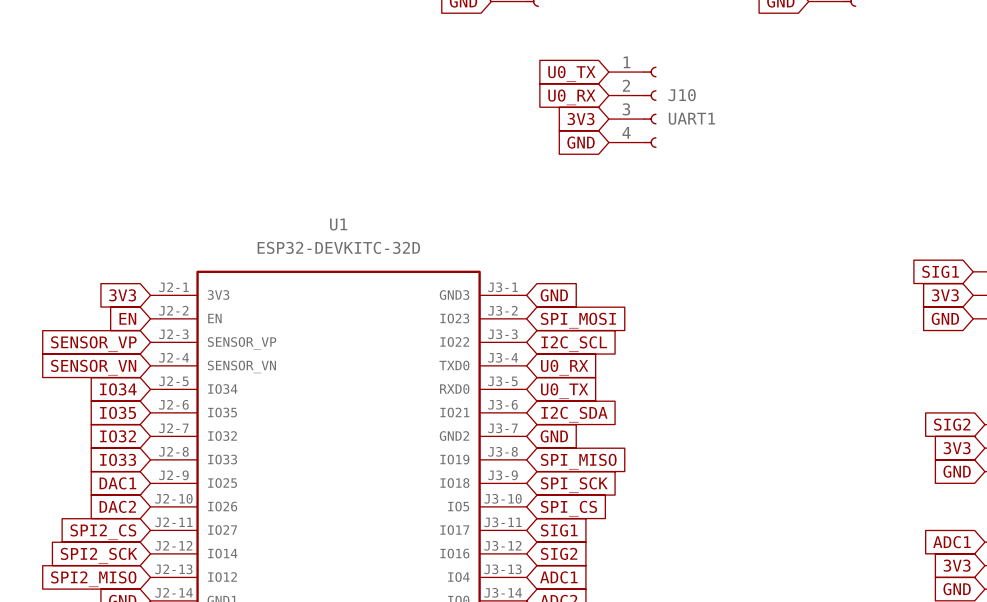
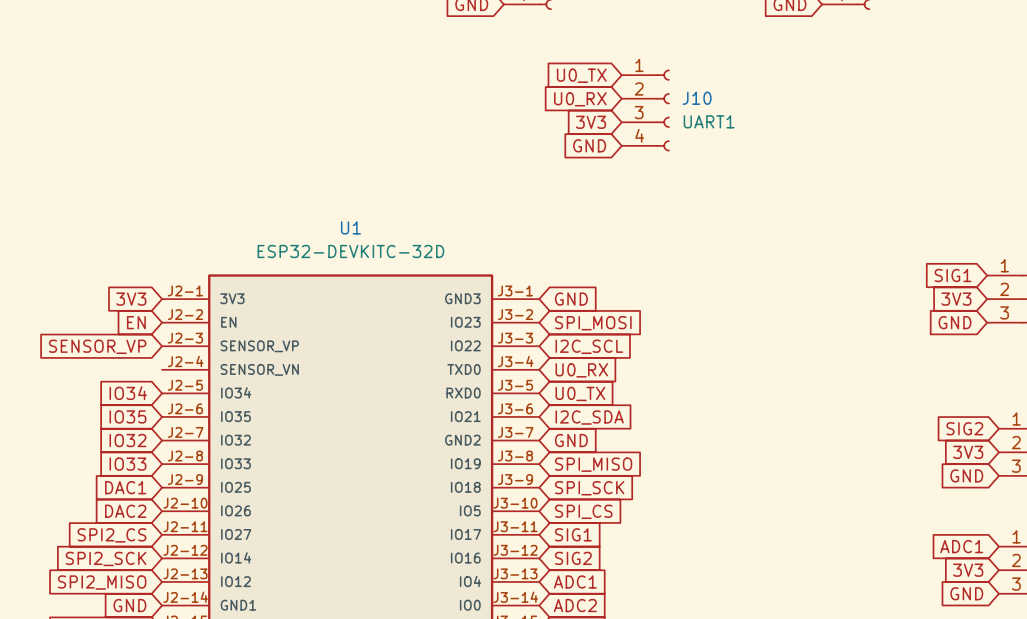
global label: SENSOR_VN (93, 367) -> none

